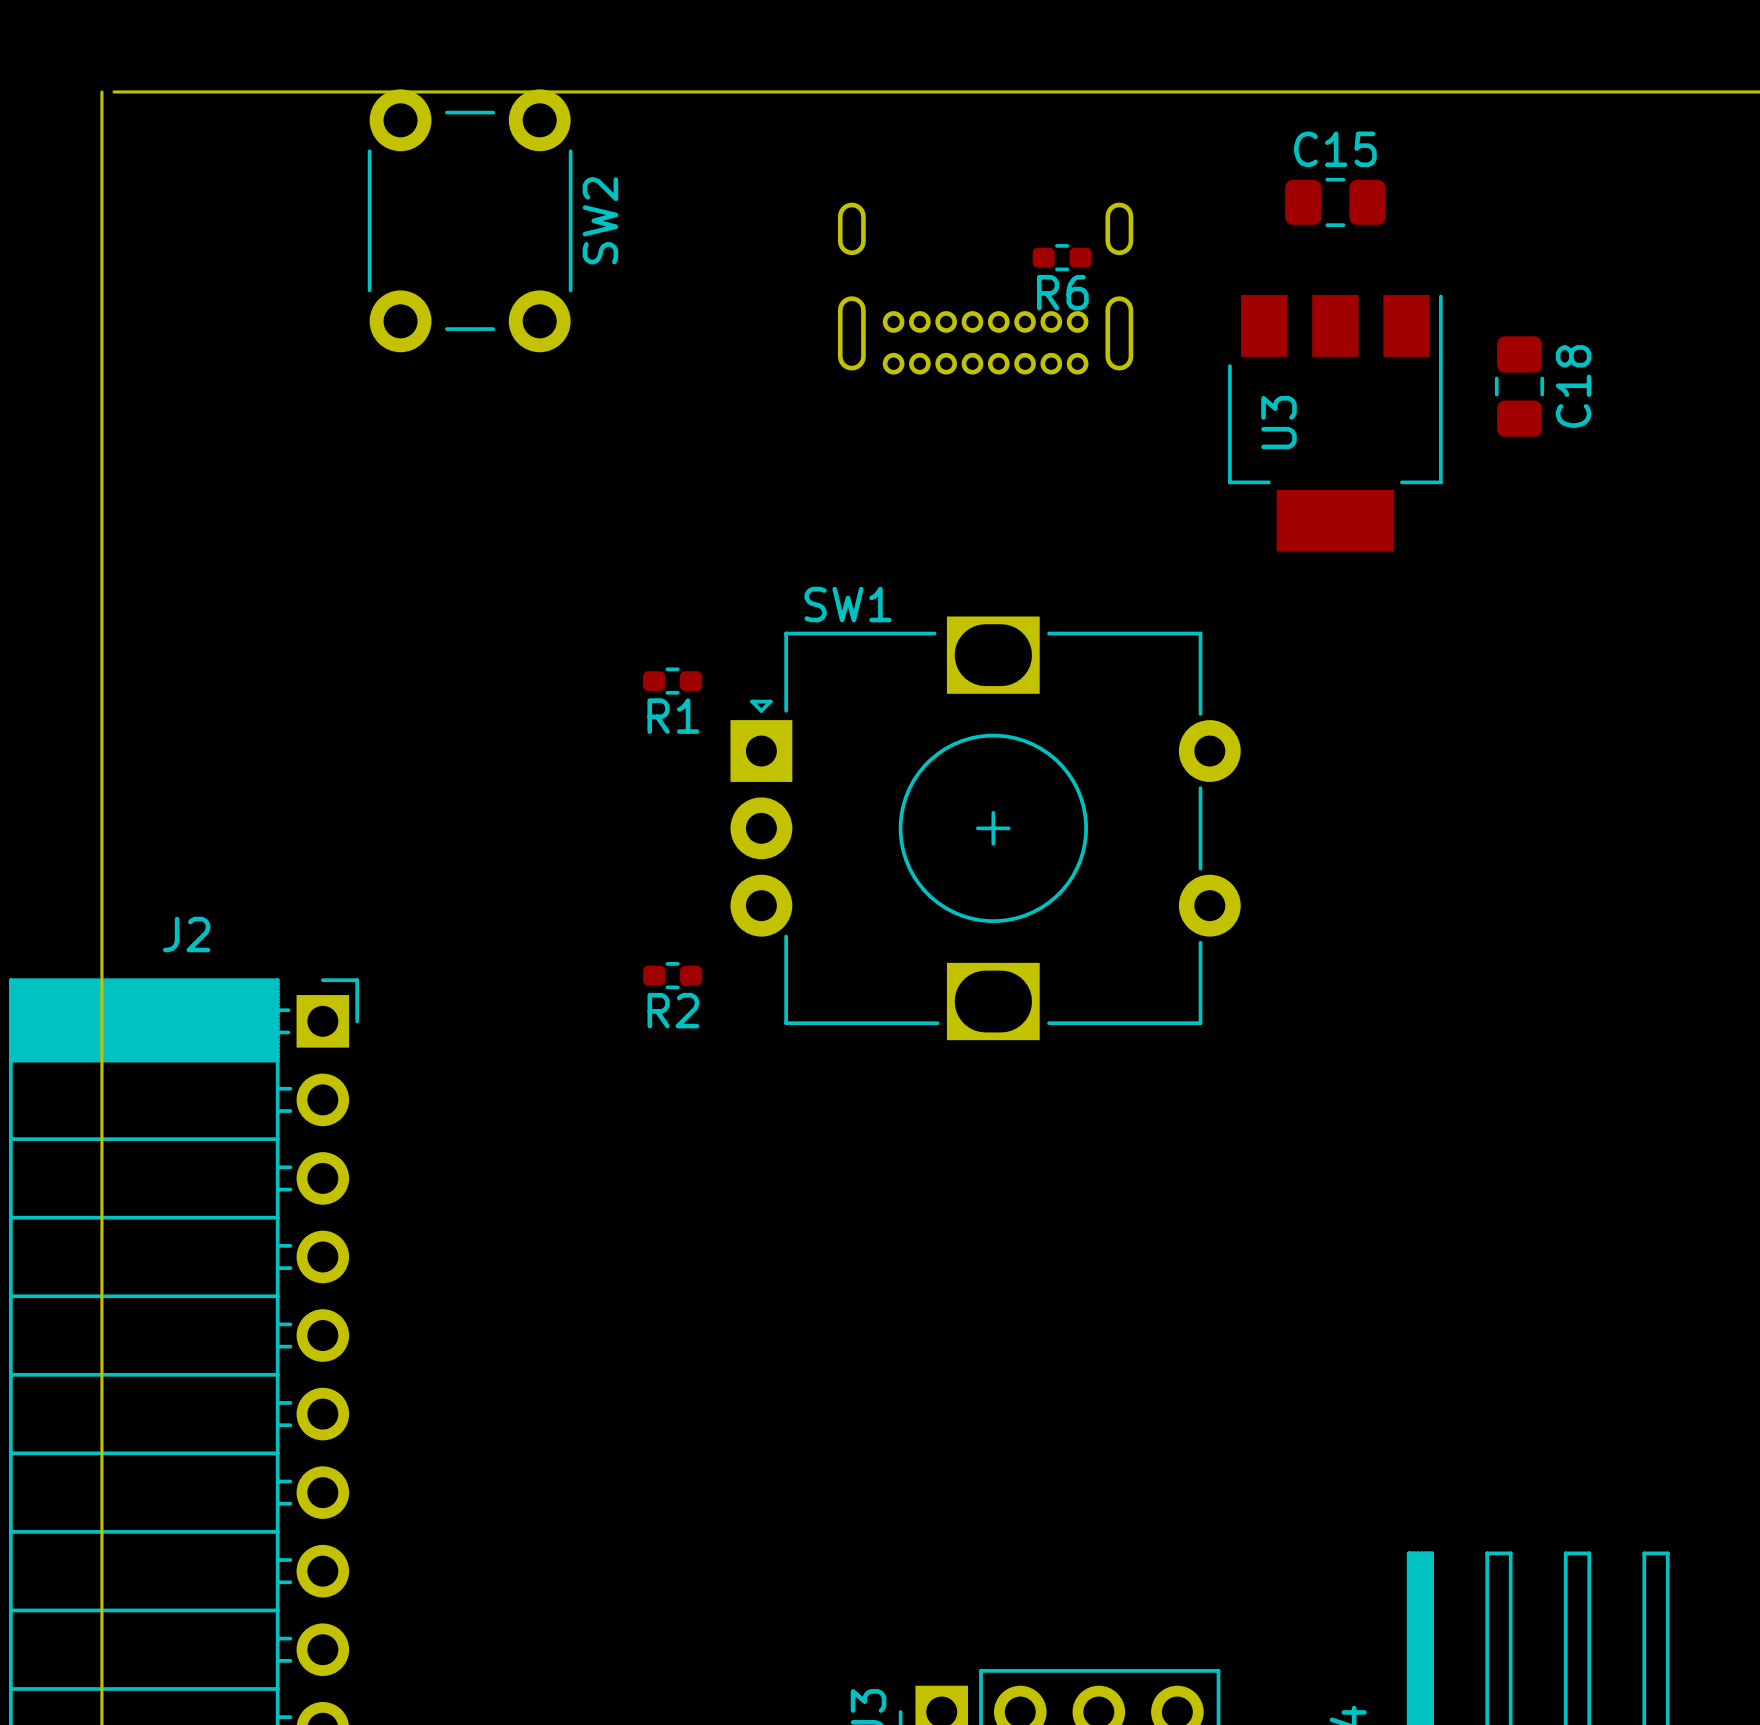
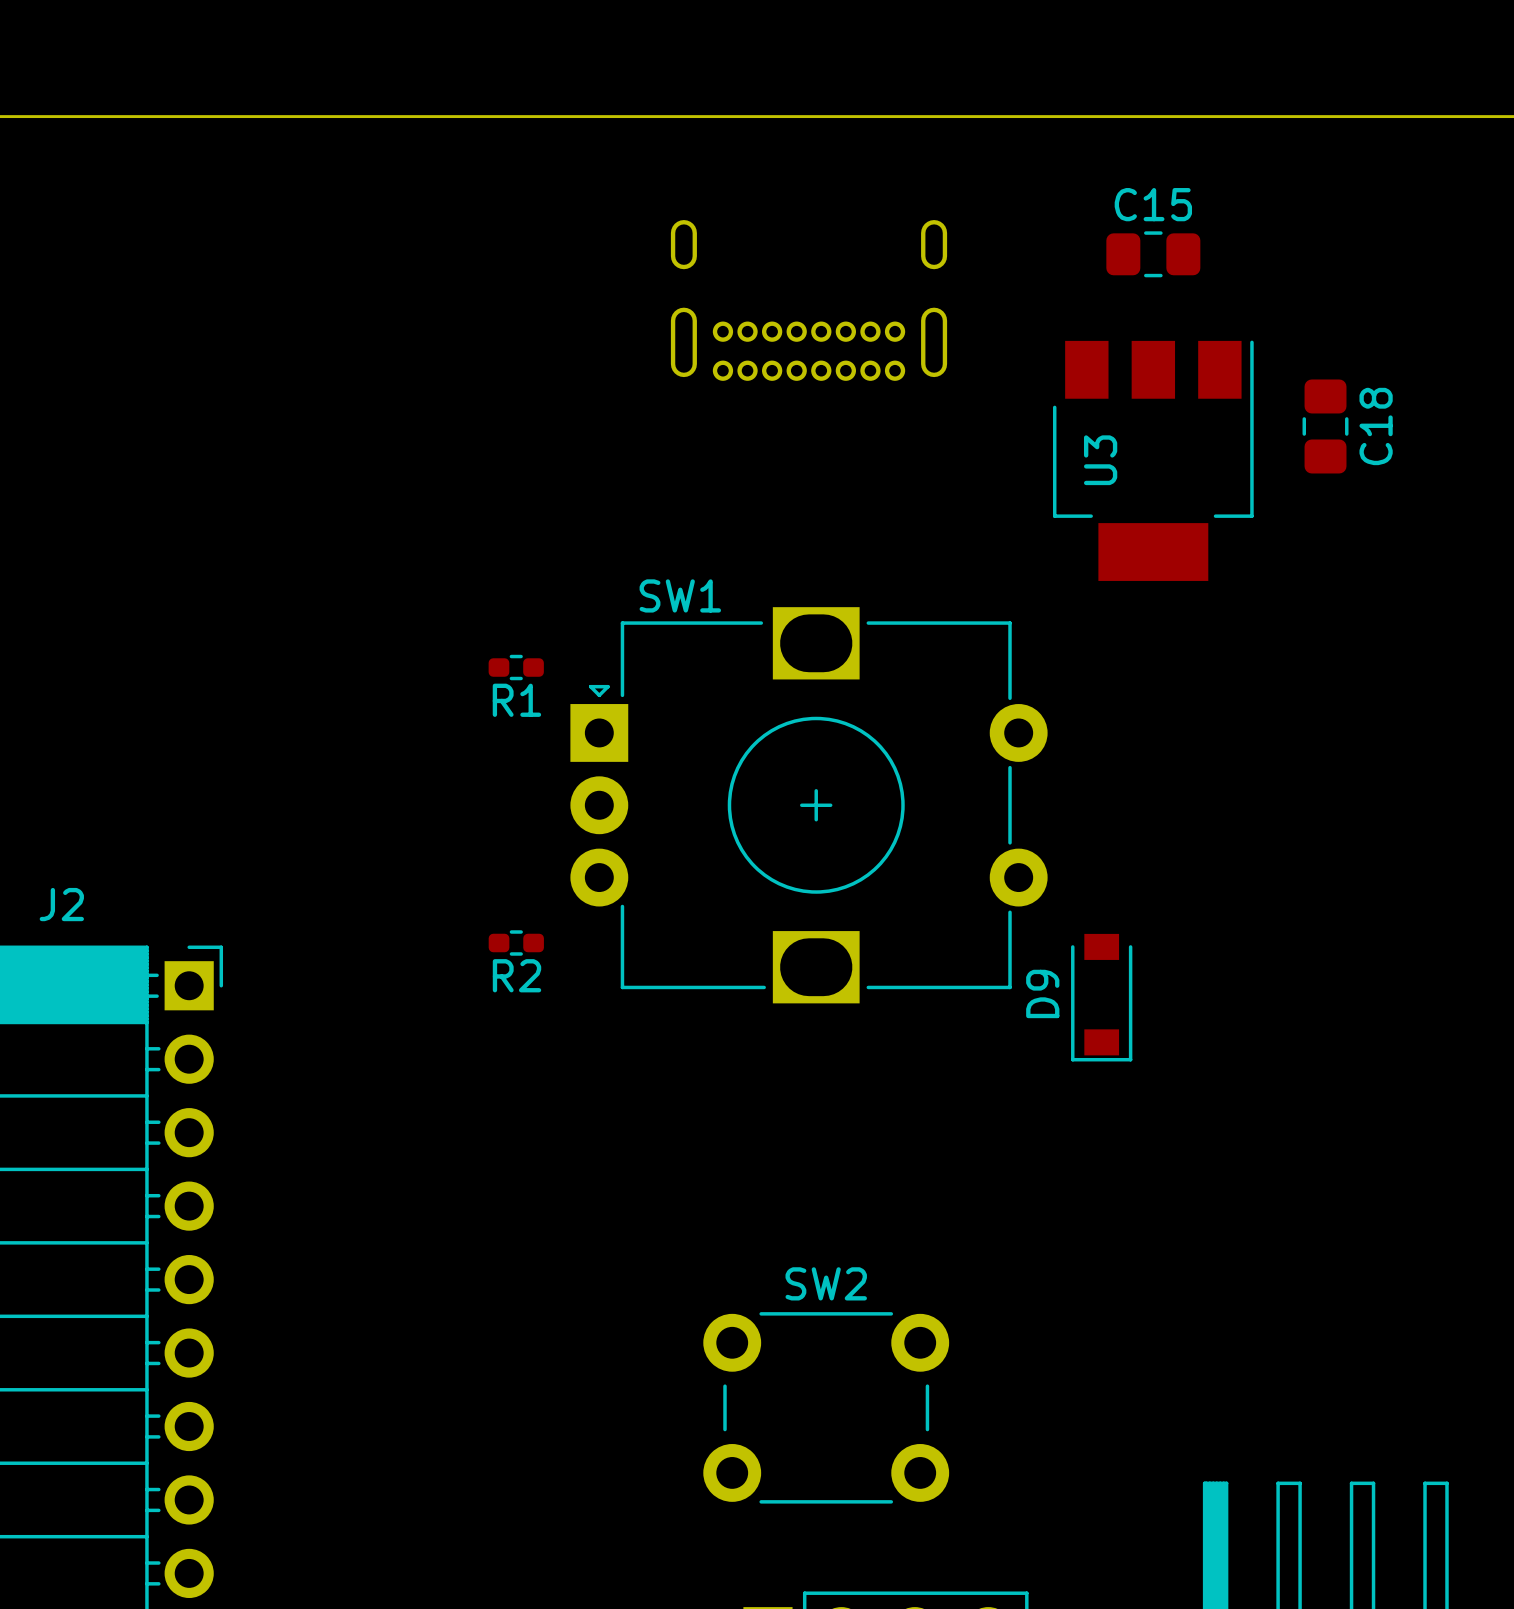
C15 position: (1335, 202) -> (1153, 254)
SW2 rotation: 0° (470, 220) -> 90° clockwise (826, 1407)
SW2 position: (470, 220) -> (826, 1407)
SW2 name position: SW2 (600, 220) -> SW2 (826, 1283)
R6: (1062, 257) -> none
C18 position: (1519, 386) -> (1325, 426)
U3 position: (1335, 423) -> (1153, 460)
D9: none -> (1101, 997)

